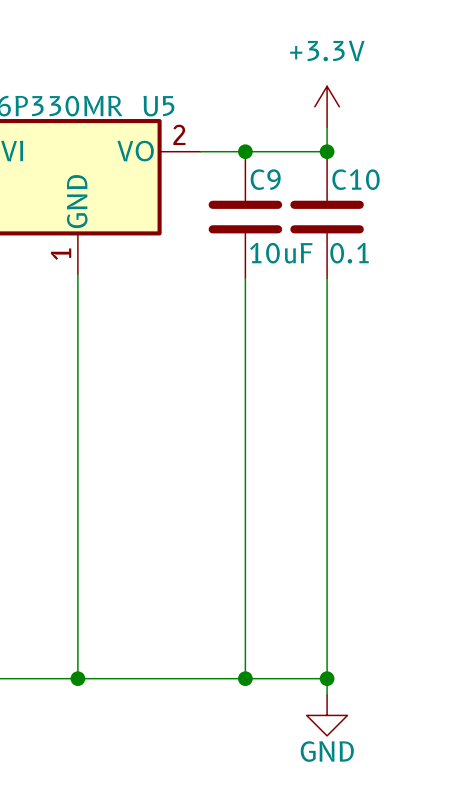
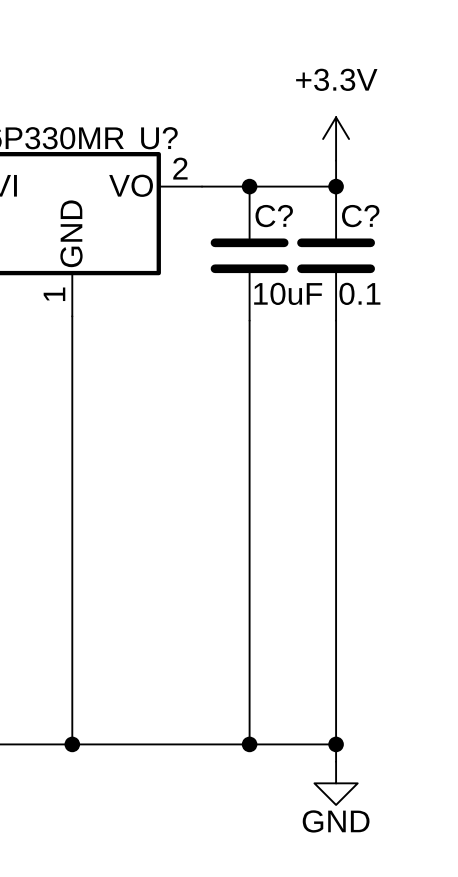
U5 name: U5 (158, 106) -> U? (159, 138)
C9 name: C9 (265, 179) -> C? (274, 216)
C10 name: C10 (356, 179) -> C? (360, 216)

